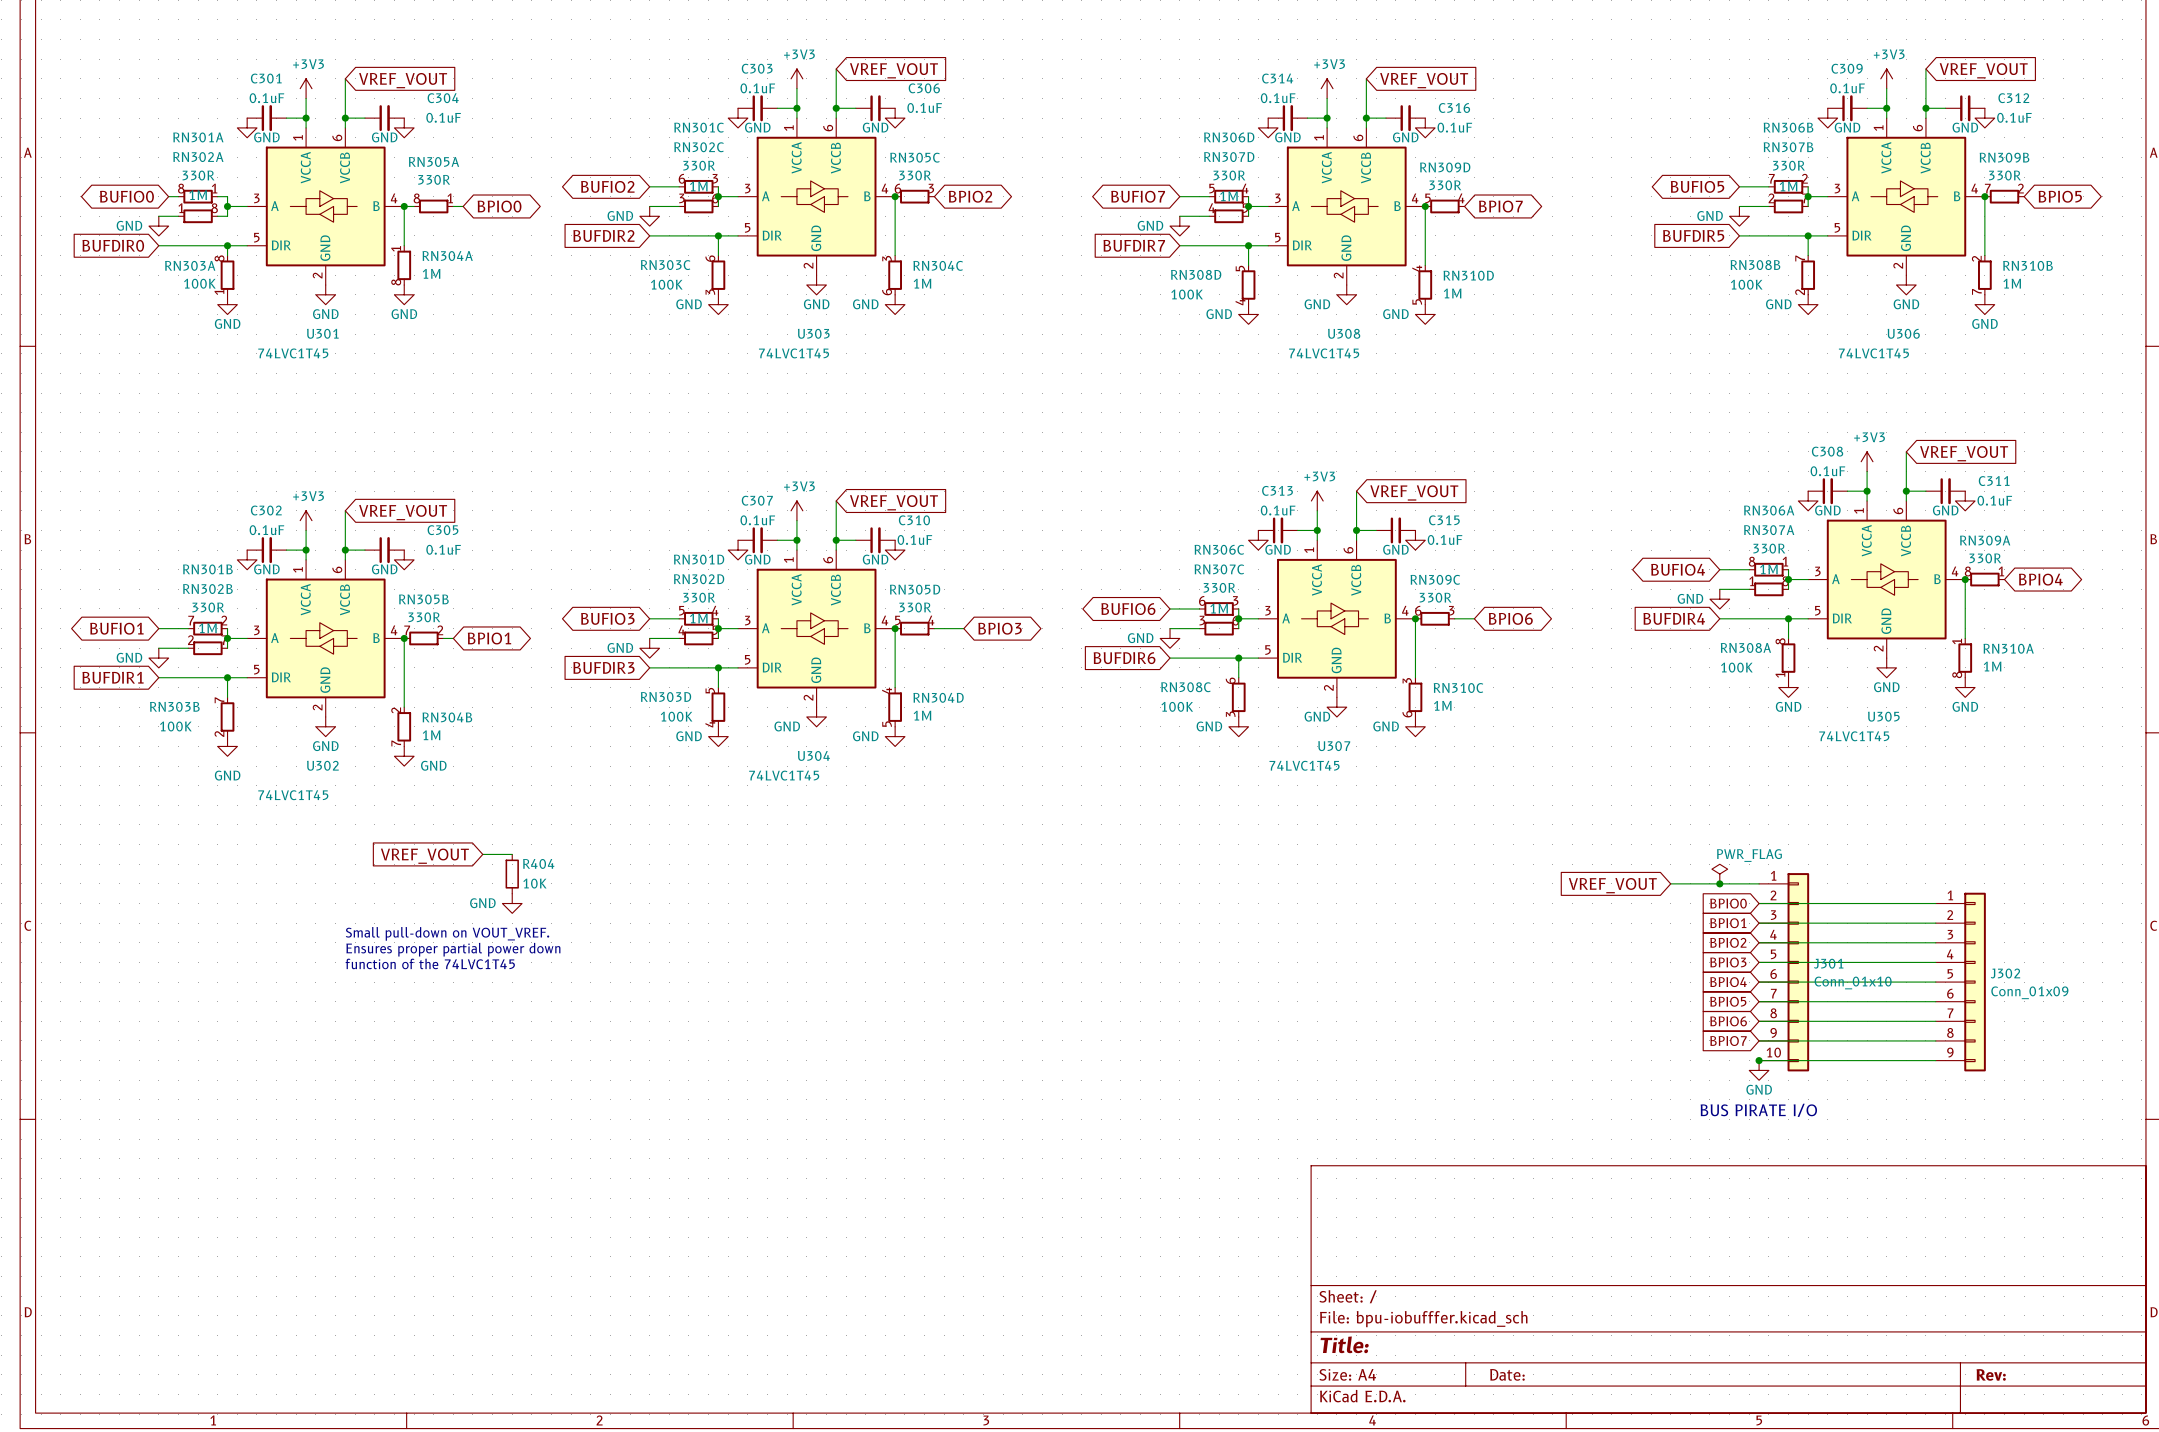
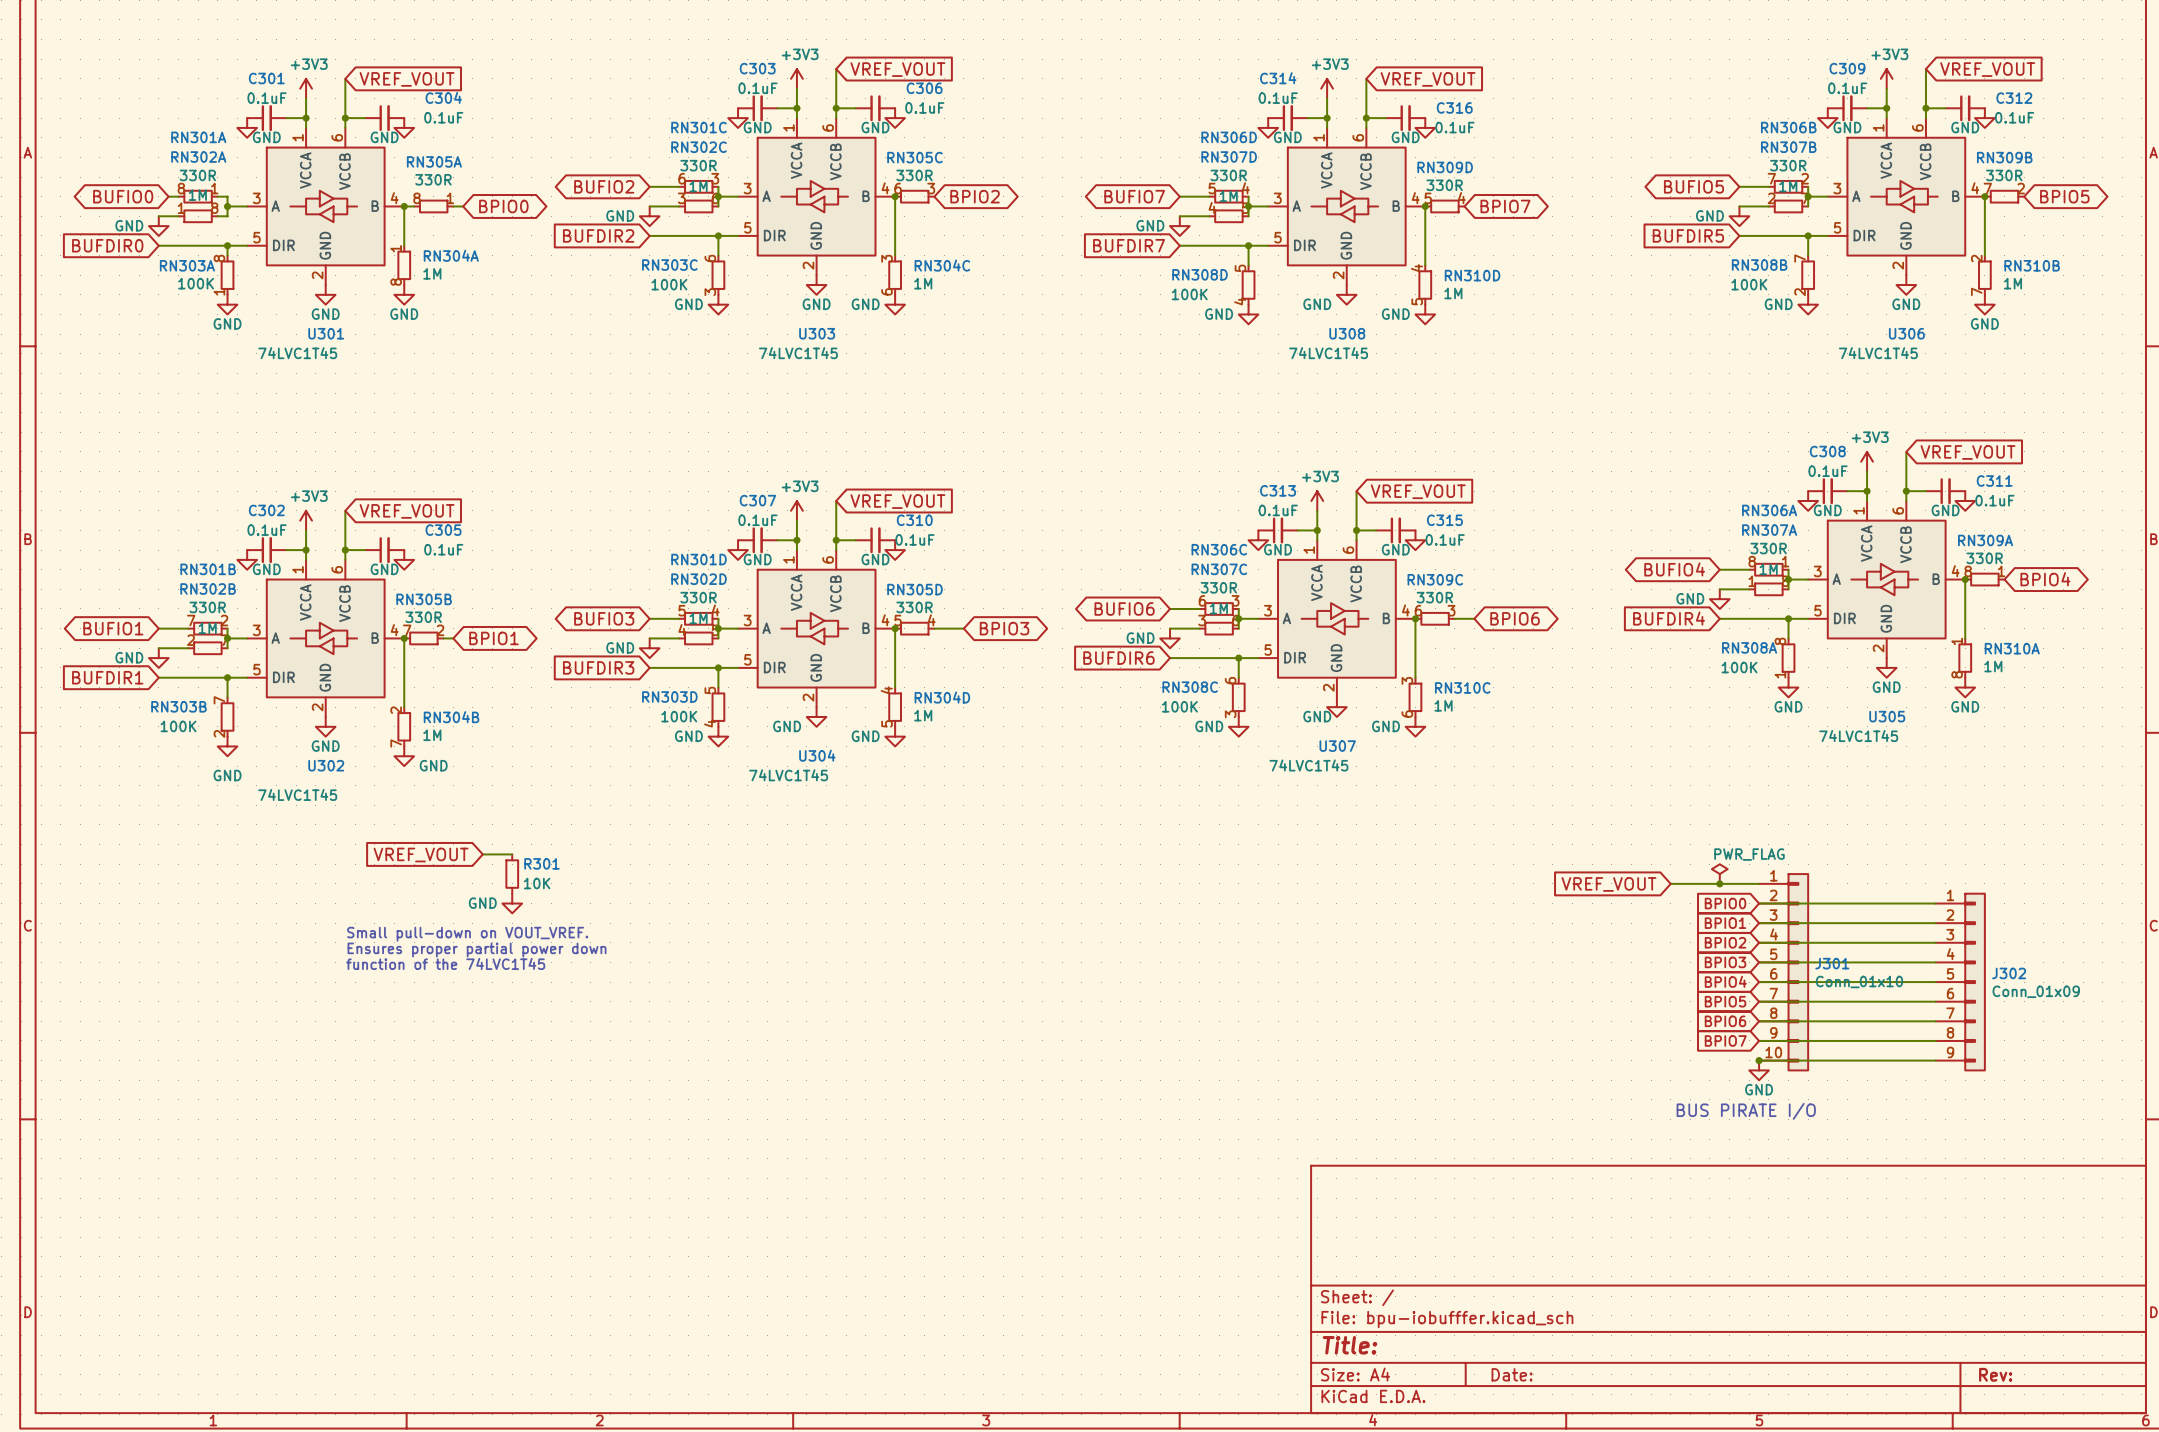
R404 name: R404 (538, 863) -> R301 (542, 863)

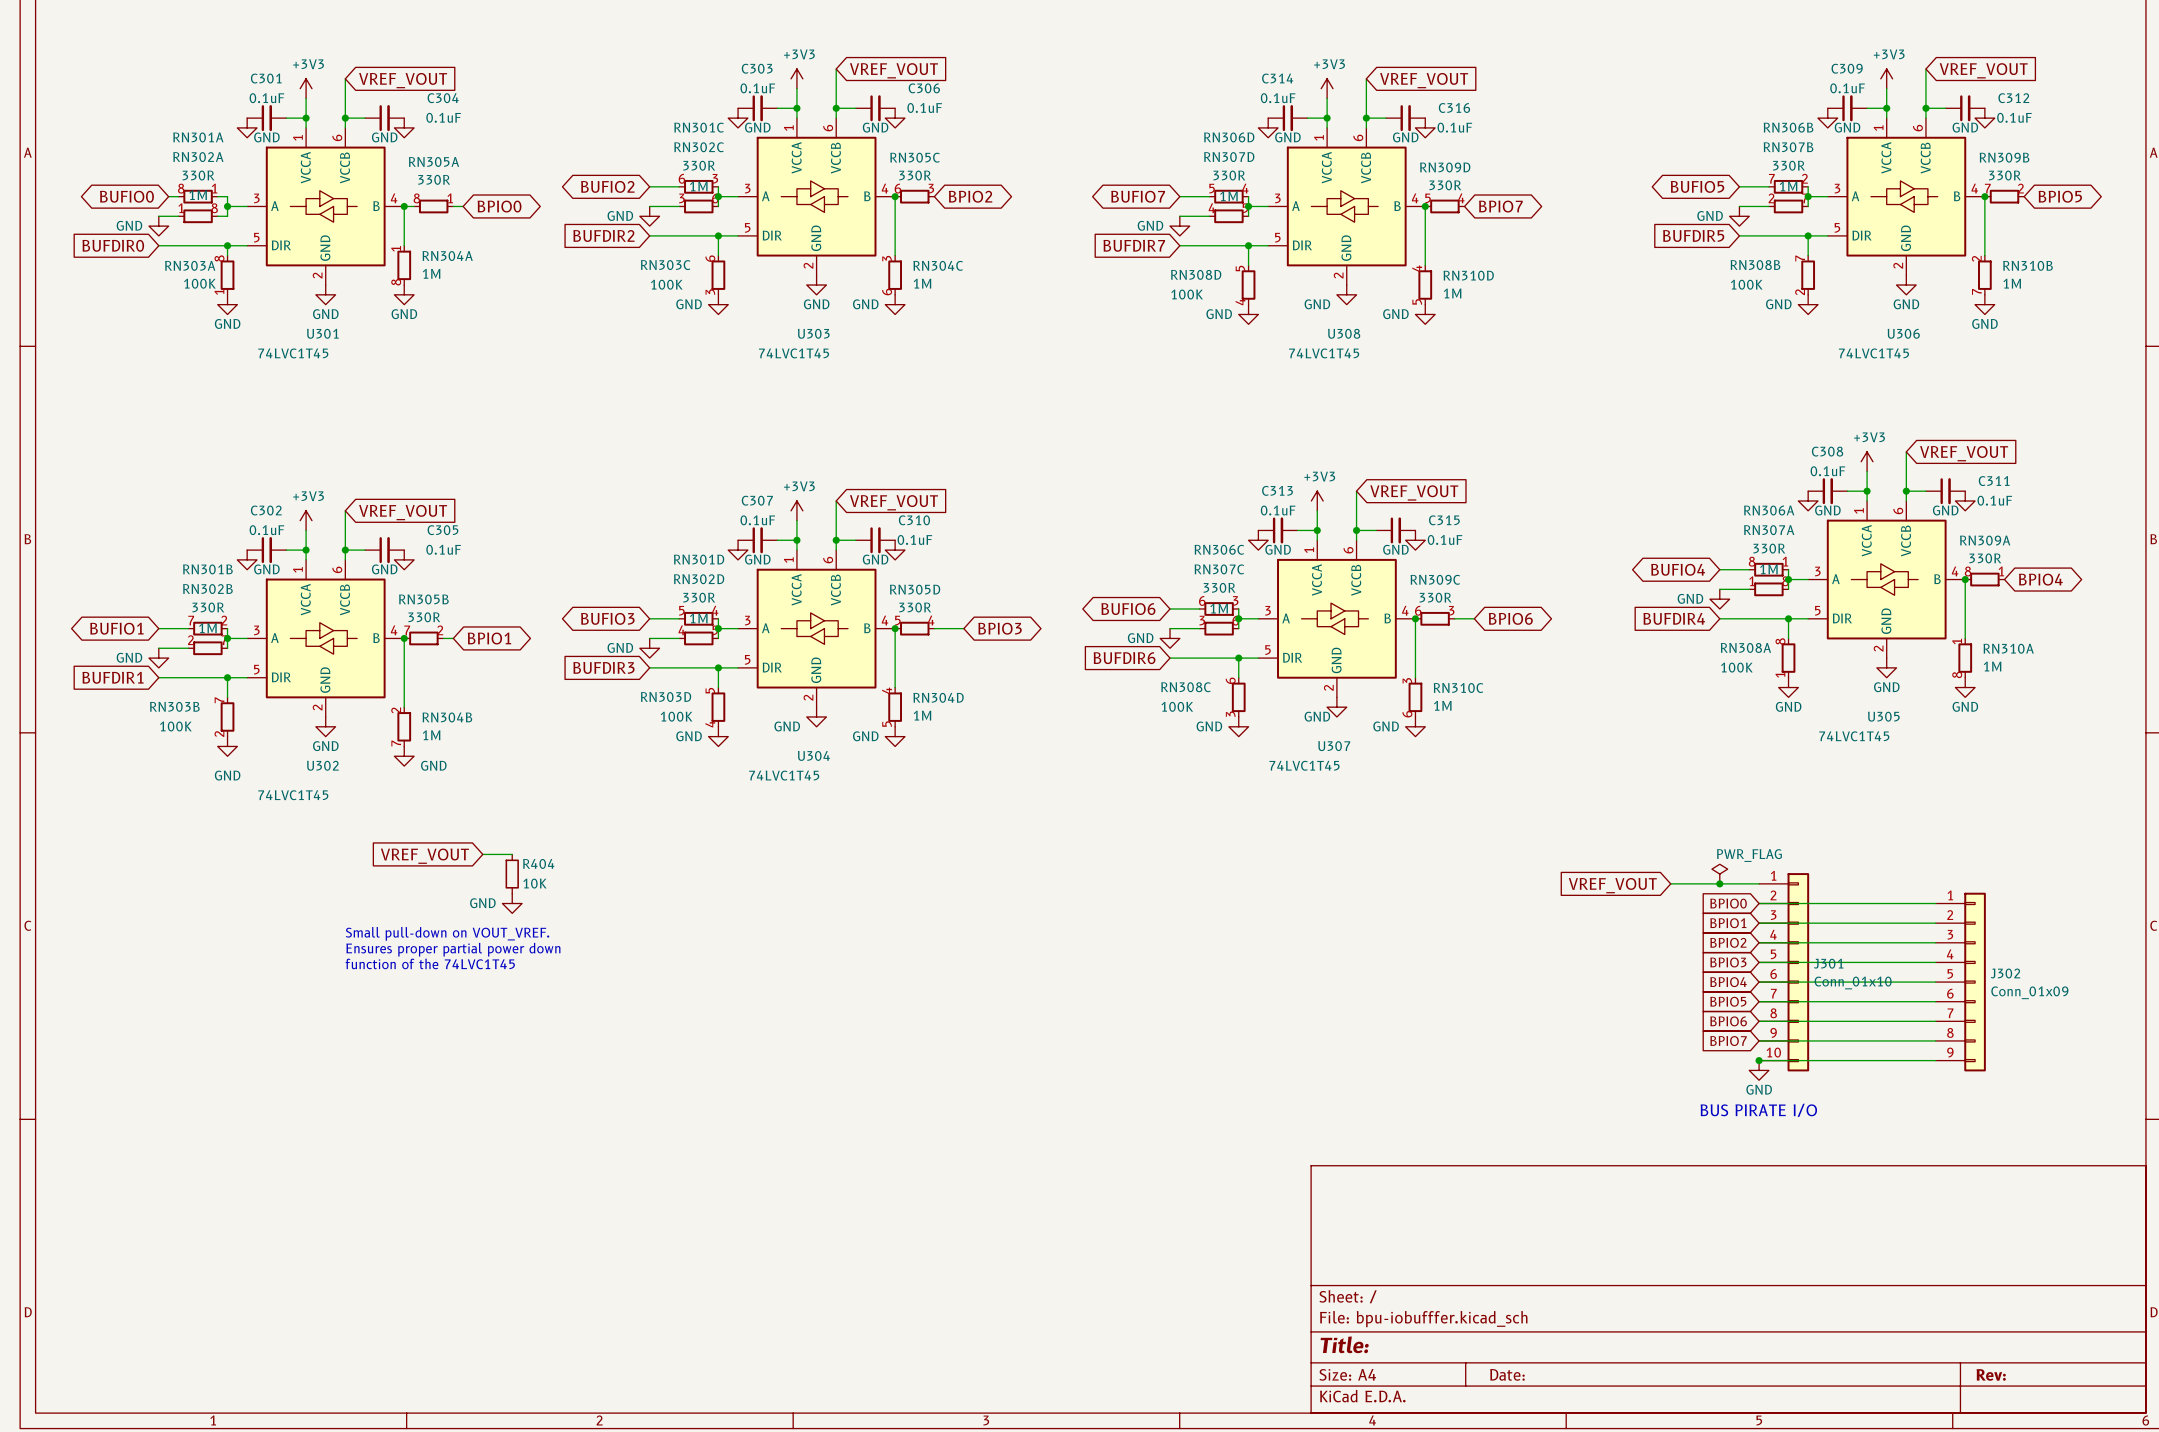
R301 name: R301 (542, 863) -> R404 (538, 863)

